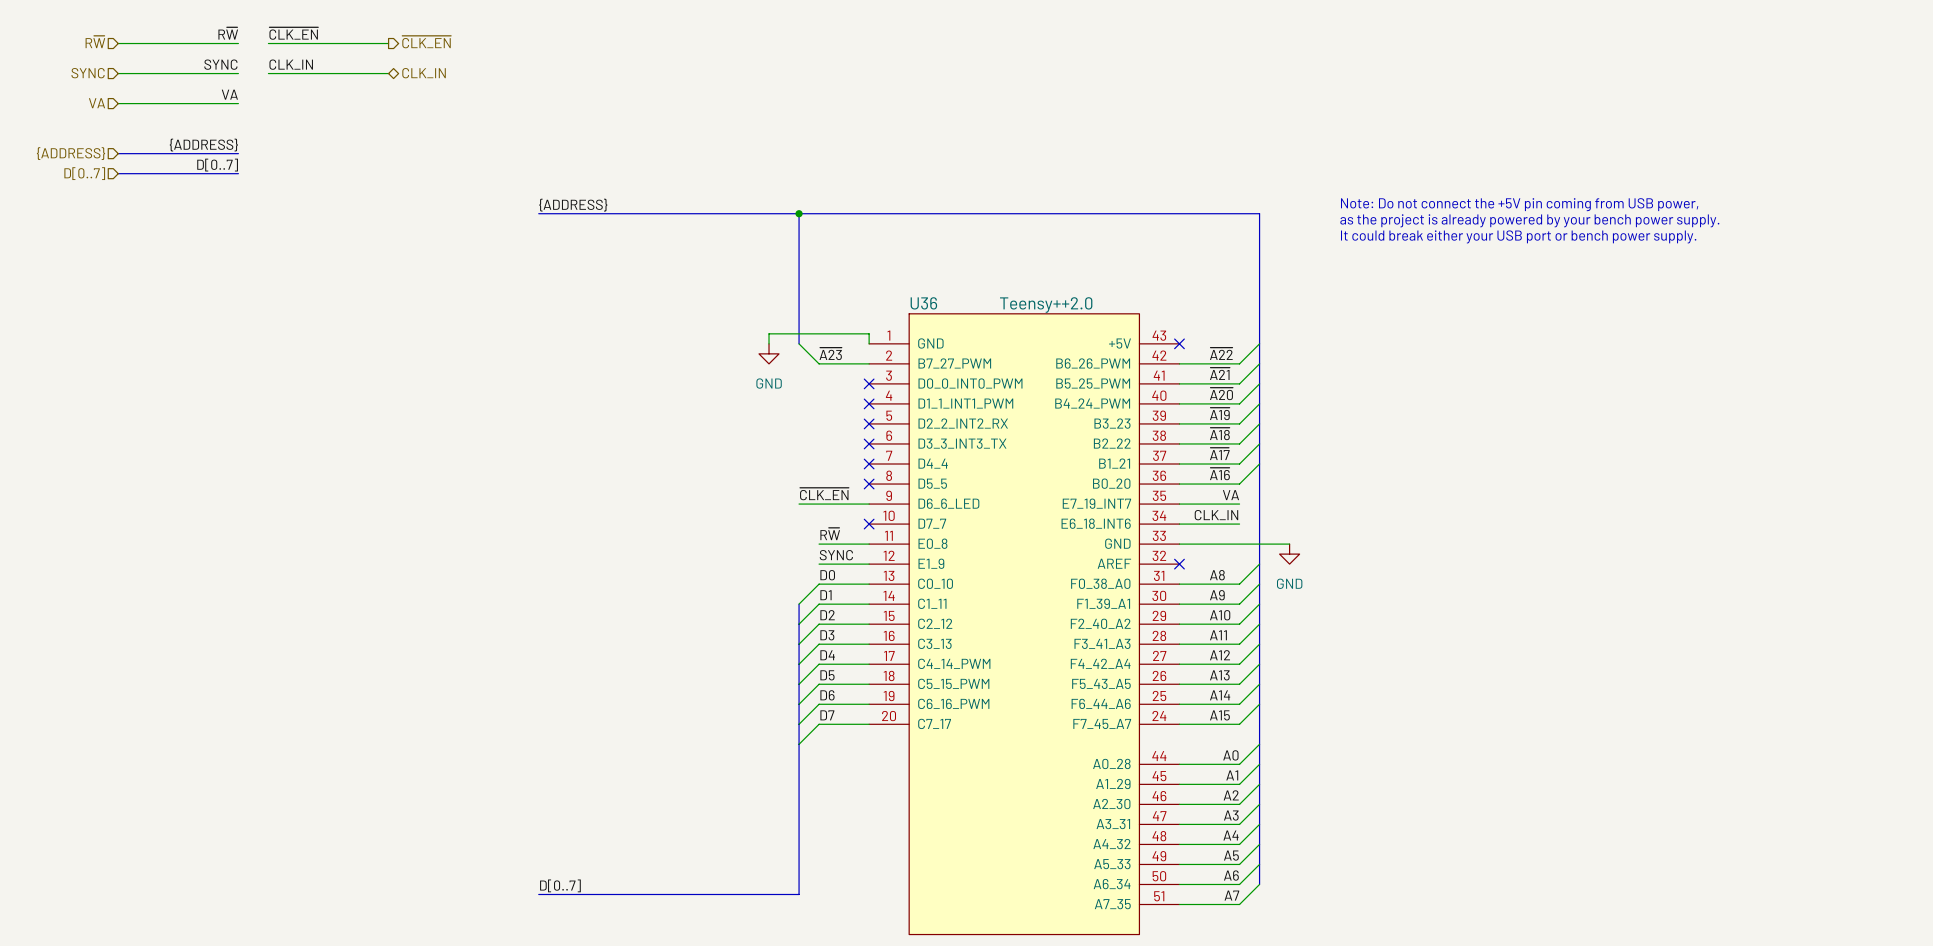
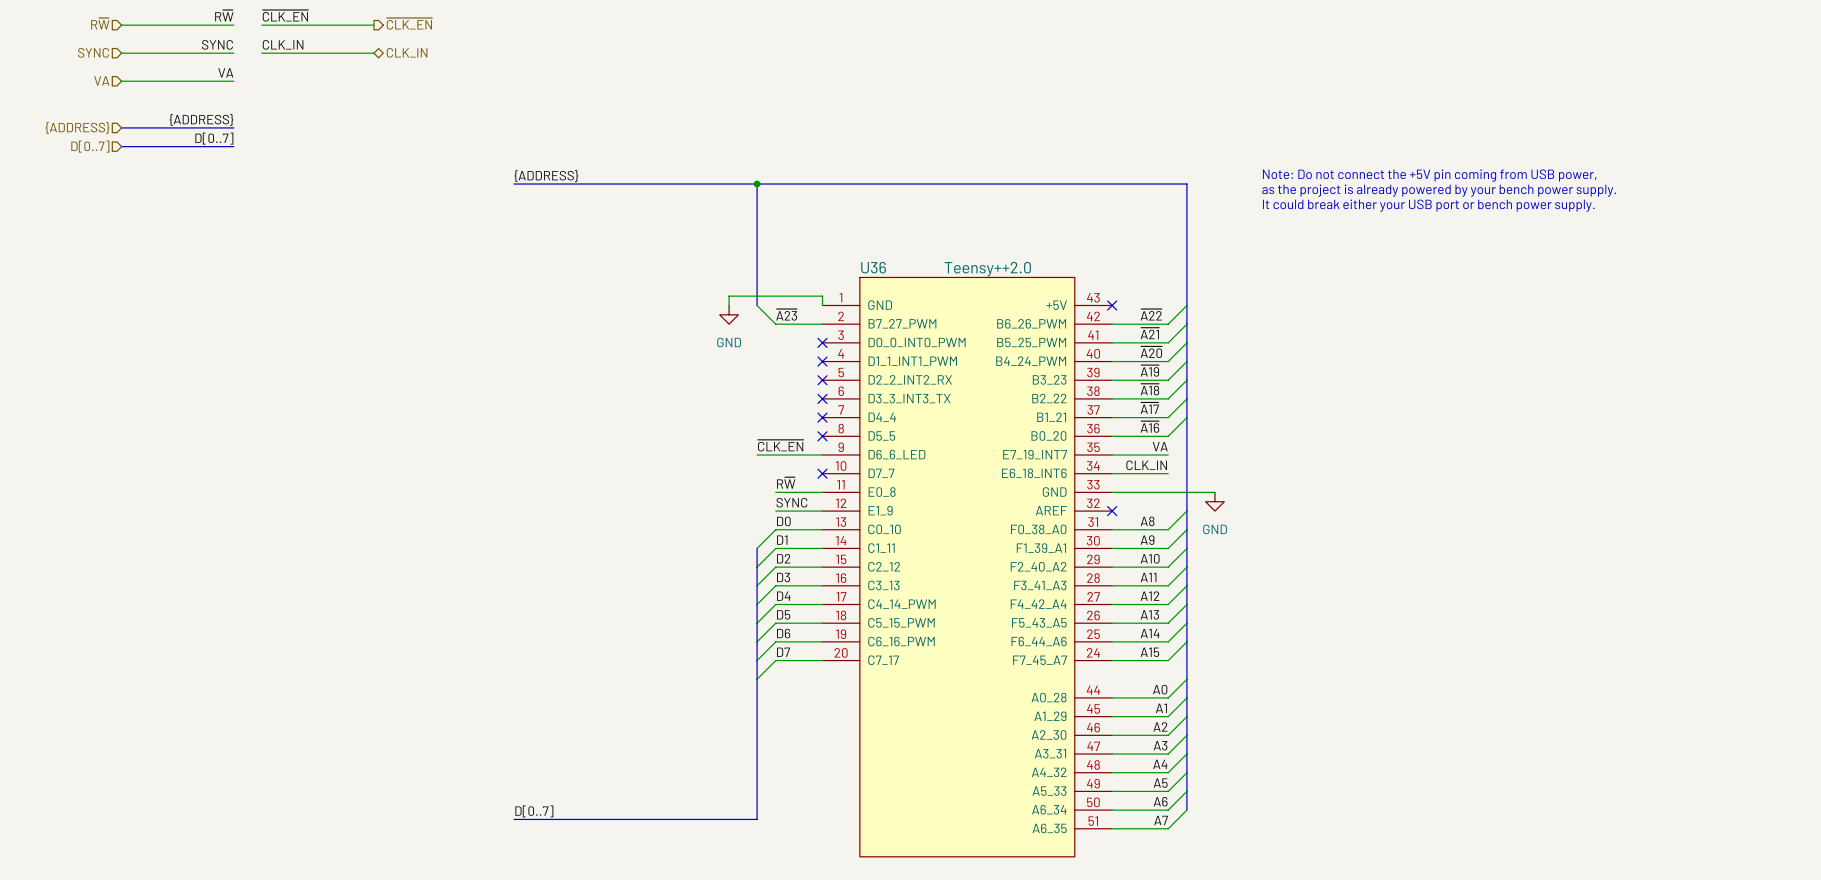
U36 pin name: A7_35 (1112, 904) -> A6_35 (1049, 828)

